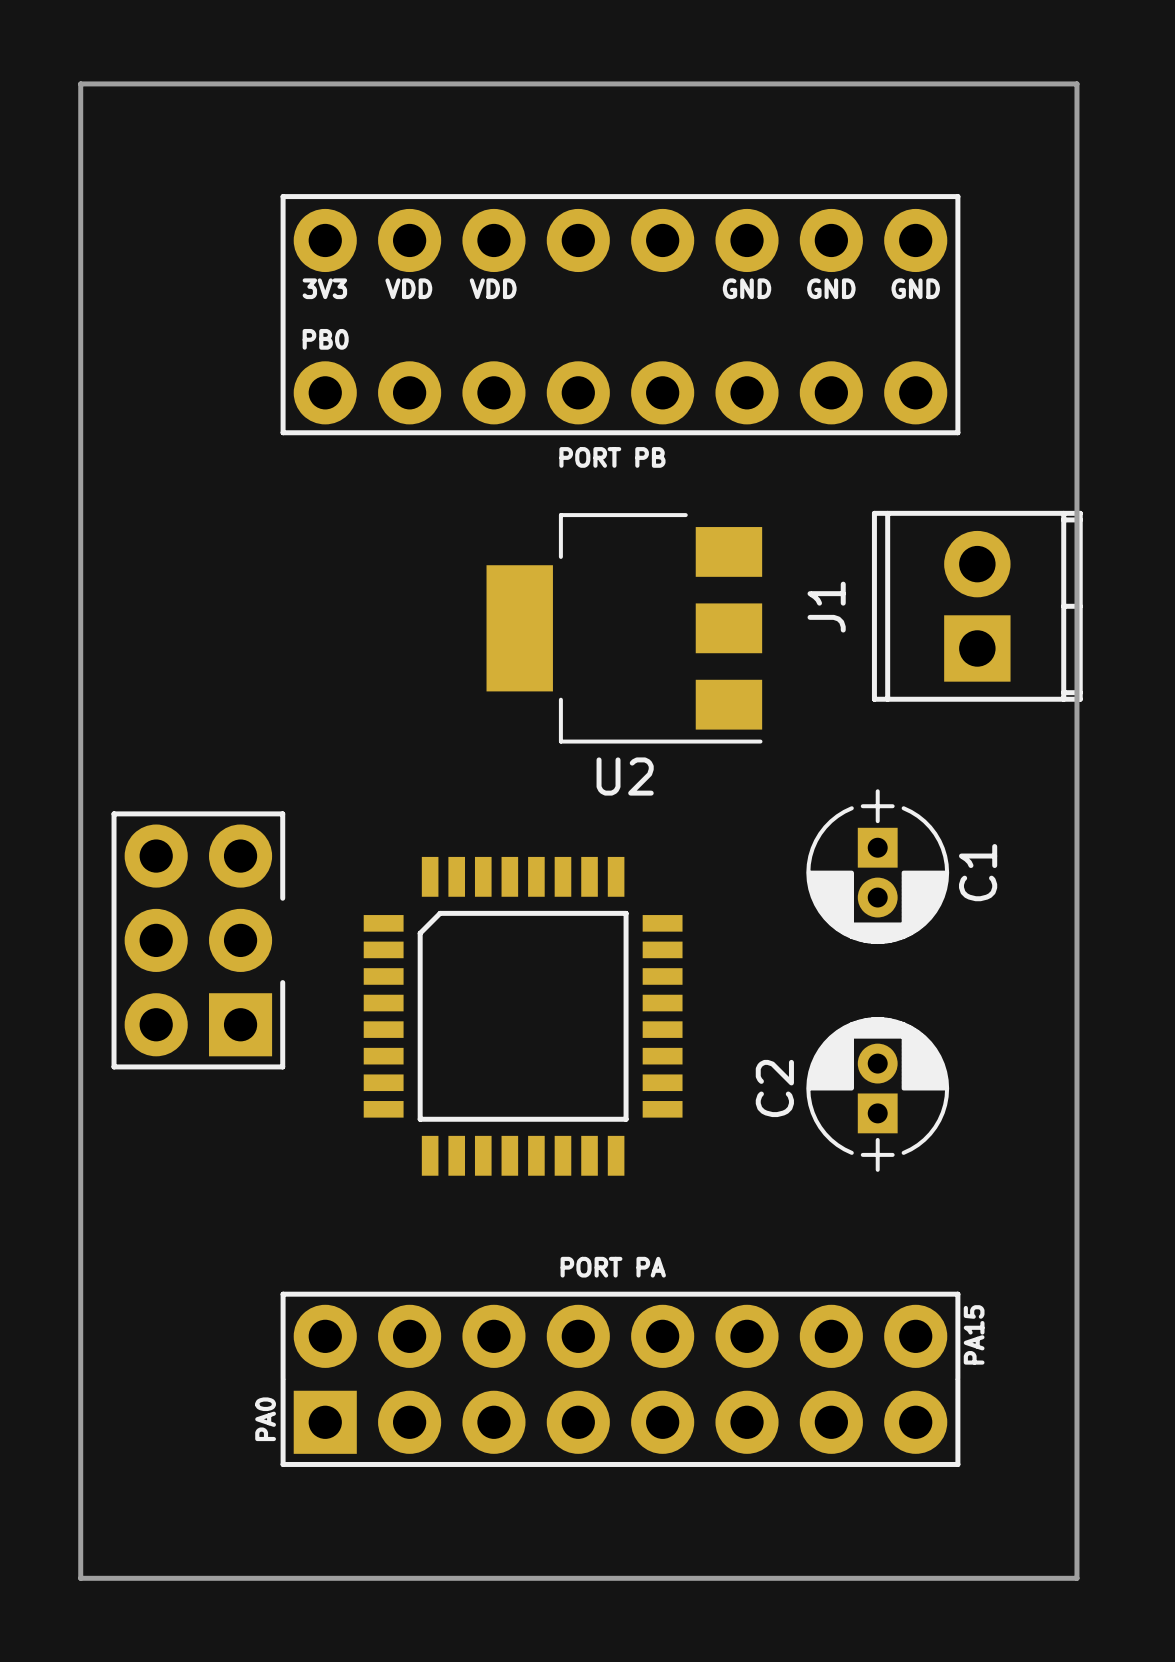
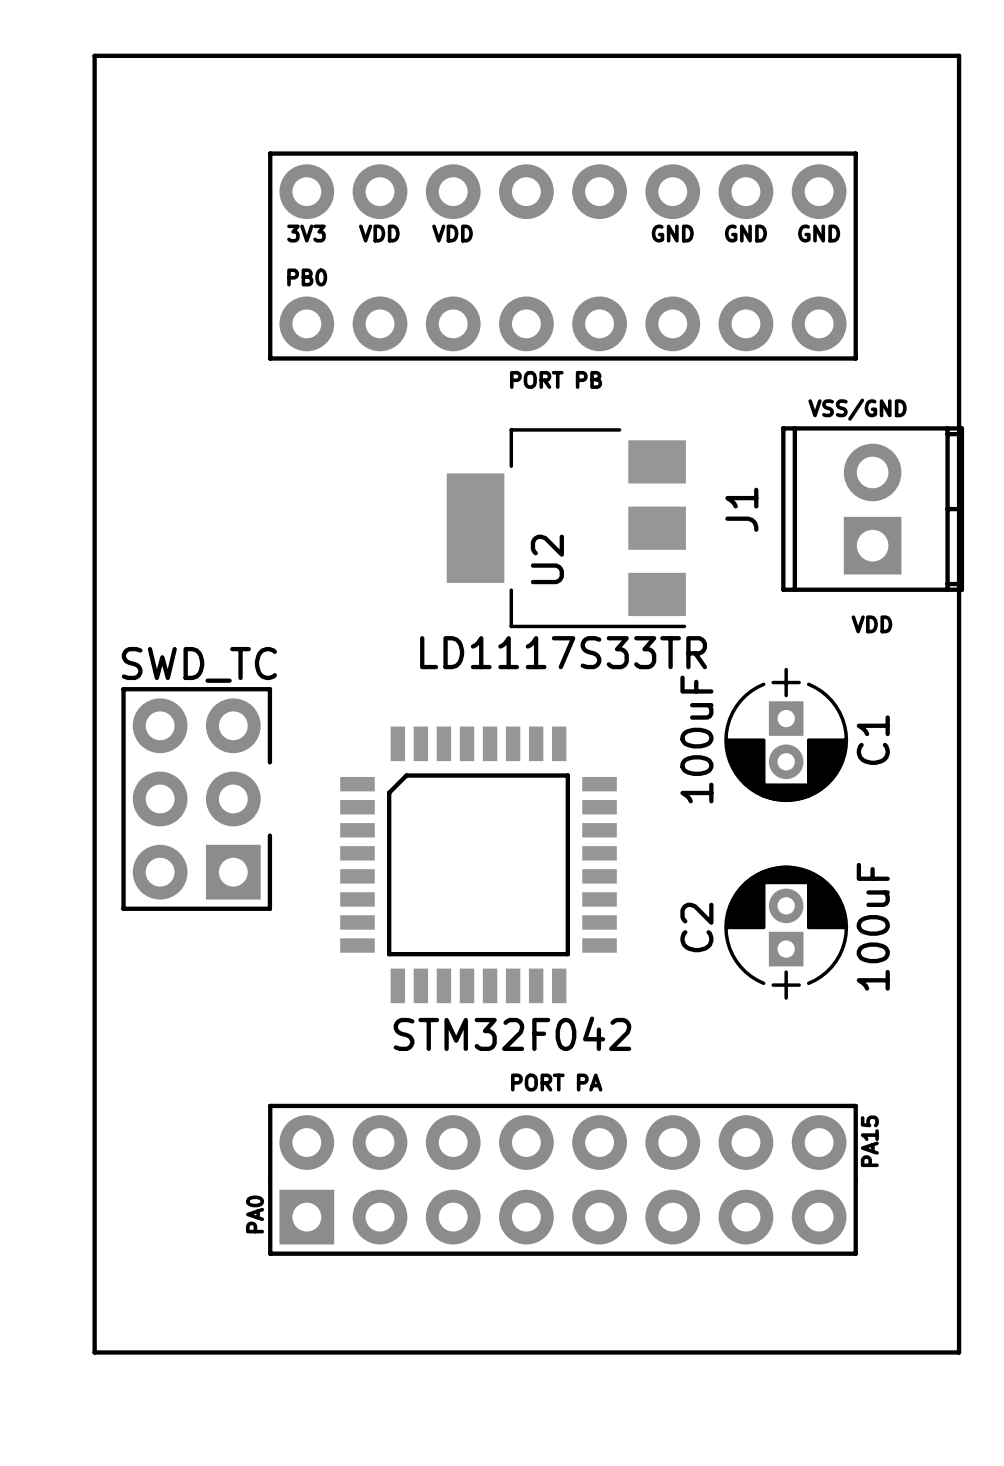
text: none -> VSS/GND (857, 409)
text: none -> VDD (871, 624)
U2 value: none -> LD1117S33TR (563, 652)
U2 name rotation: 0° (625, 776) -> 90° counterclockwise (547, 559)
U2 name position: U2 (625, 776) -> U2 (547, 559)
part value: none -> SWD_TC (199, 664)
C1 value: none -> 100uF (696, 739)
C2 value: none -> 100uF (873, 926)
part value: none -> STM32F042 (512, 1033)

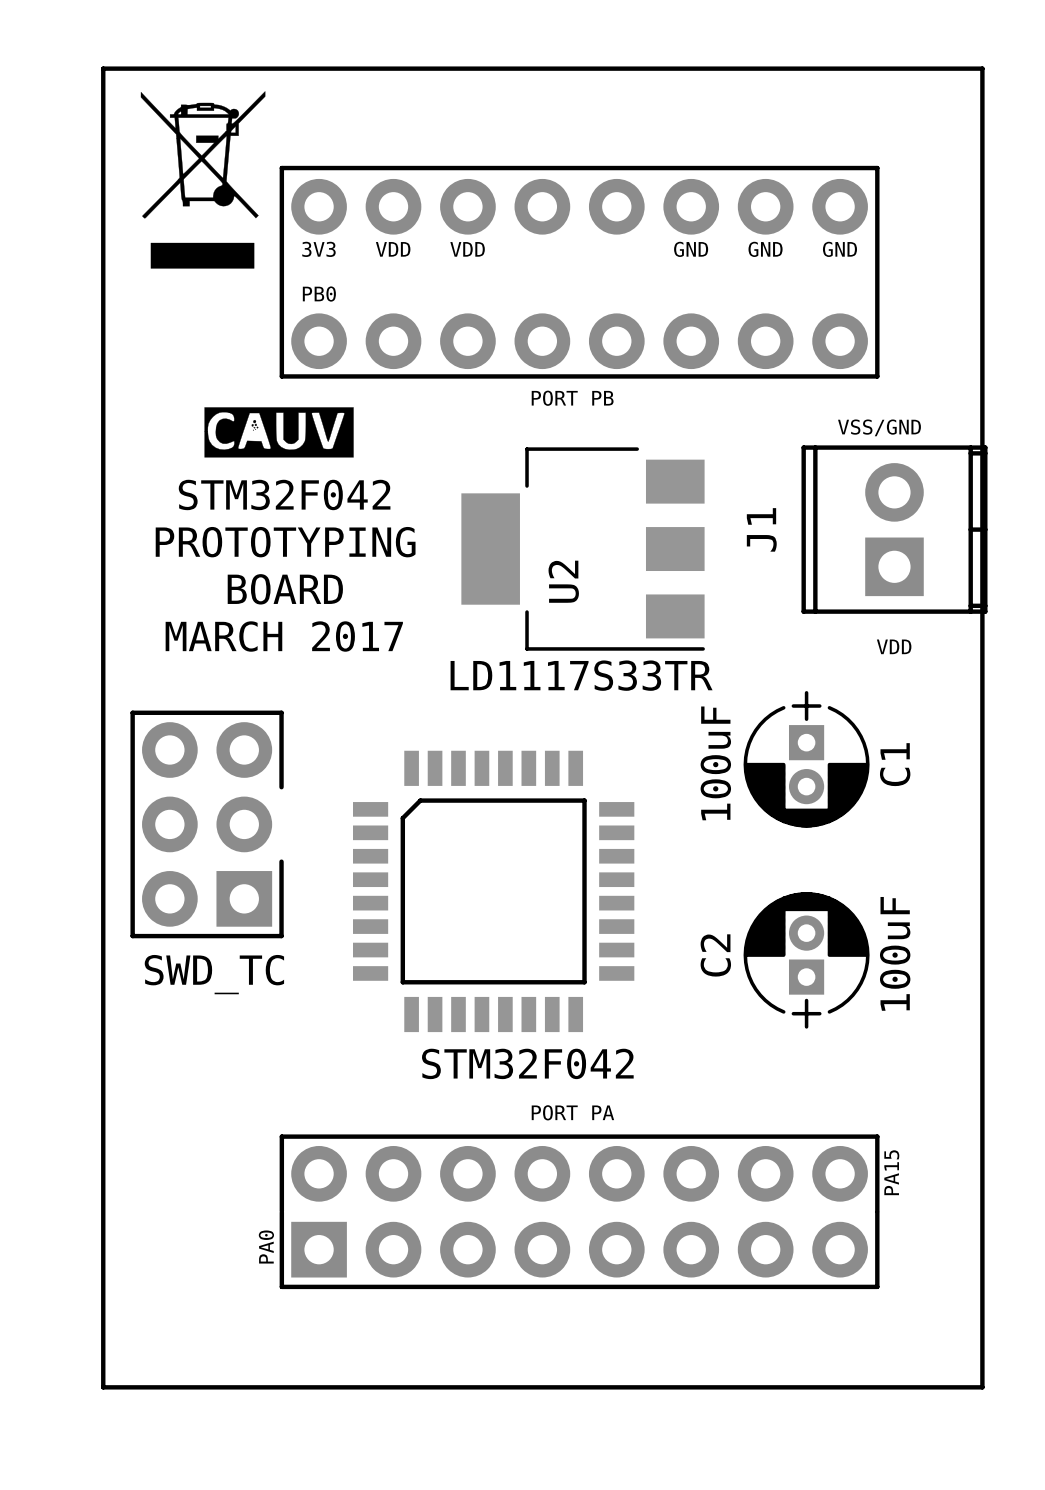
drawing: none -> [140, 91, 266, 269]
drawing: none -> [204, 407, 354, 458]
text: none -> STM32F042 (284, 494)
text: none -> PROTOTYPING (285, 542)
text: none -> BOARD (285, 589)
text: none -> MARCH 2017 (284, 636)
part value position: SWD_TC (199, 664) -> SWD_TC (214, 974)

